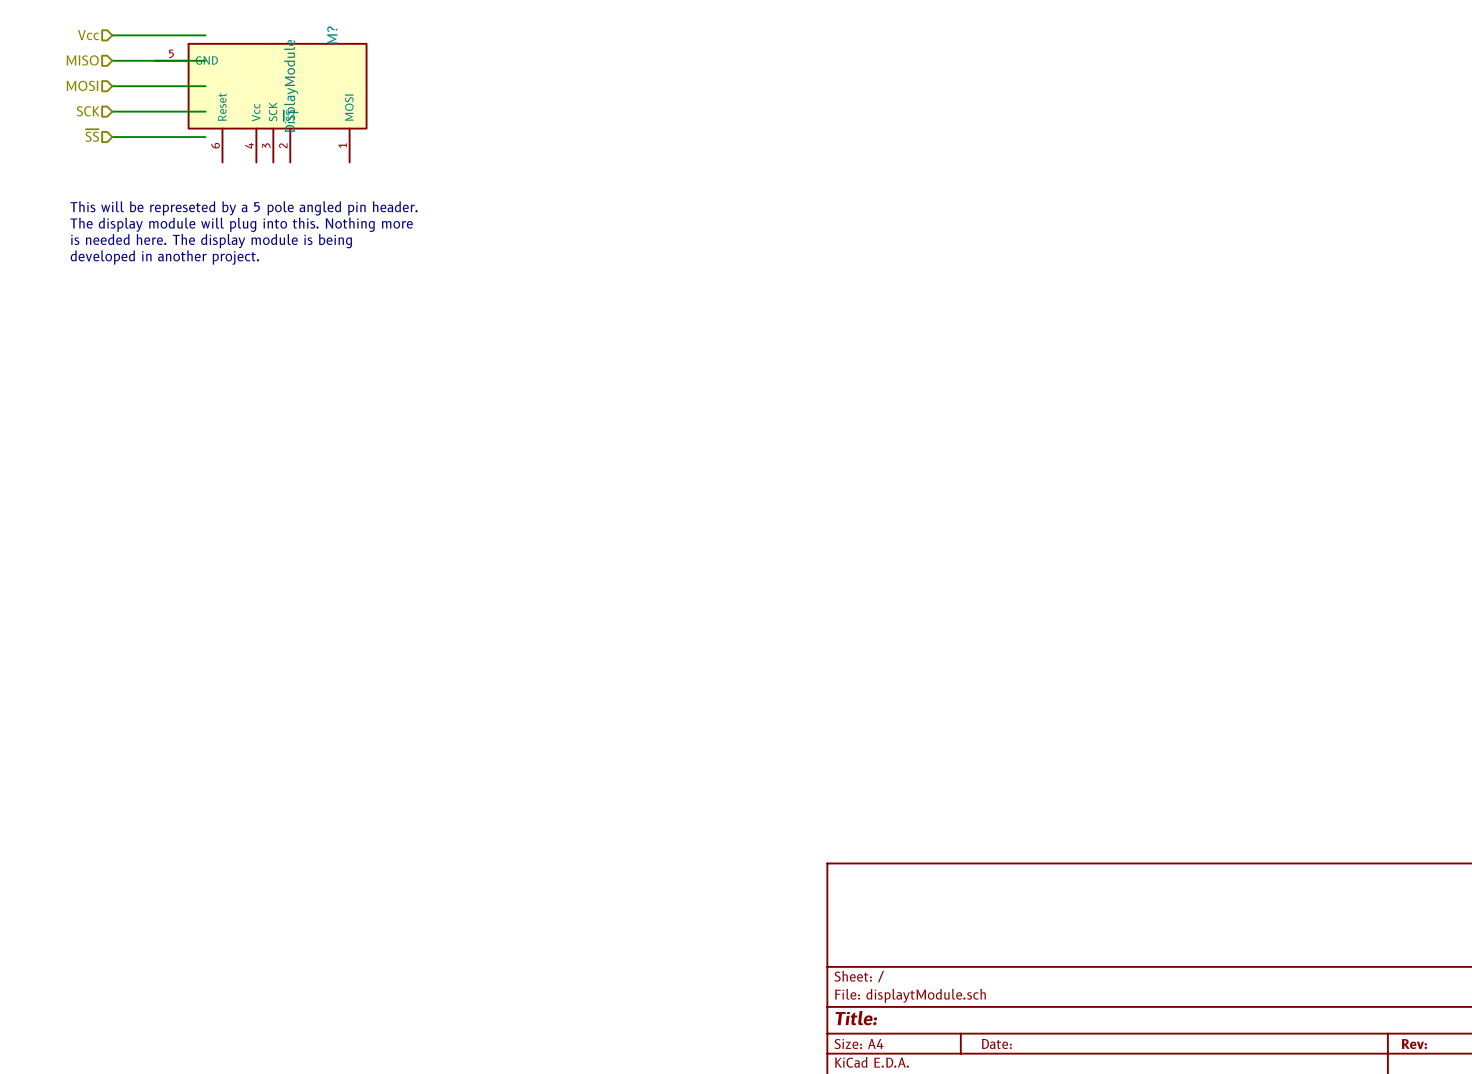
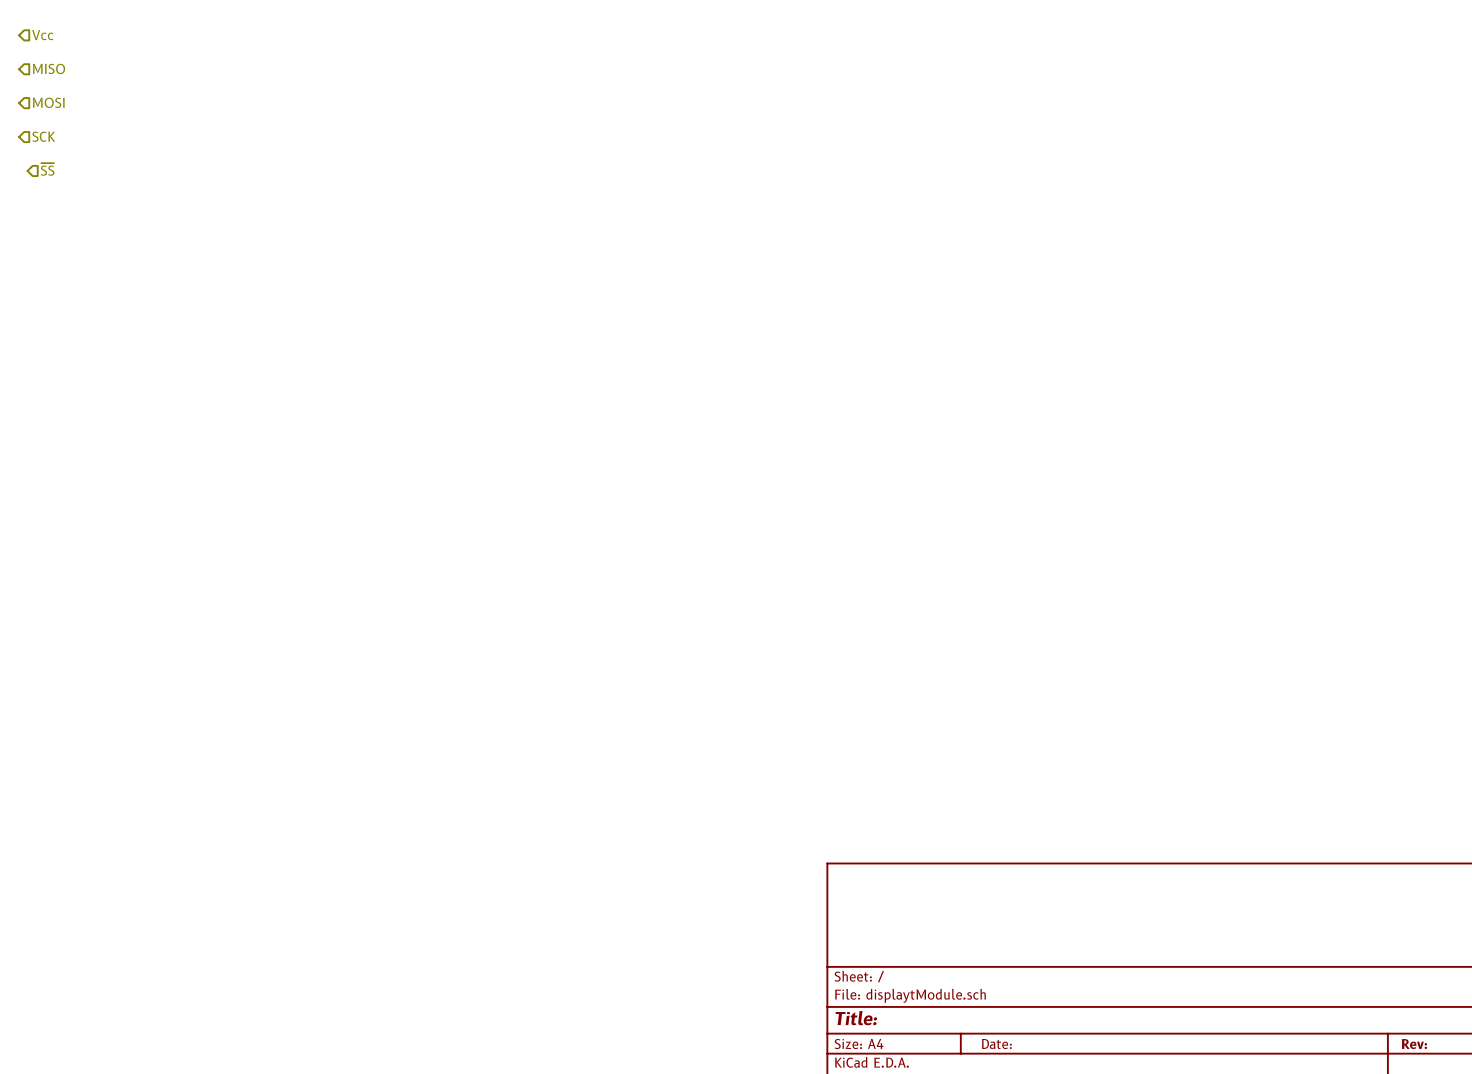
hierarchical label rotation: 0° (88, 35) -> 180° (42, 35)
hierarchical label position: Vcc (88, 35) -> Vcc (42, 35)
wire: (112, 35) (205, 35) -> none
hierarchical label rotation: 0° (82, 60) -> 180° (49, 68)
wire: (112, 60) (205, 60) -> none
hierarchical label rotation: 0° (82, 85) -> 180° (48, 102)
wire: (112, 86) (205, 86) -> none
M?: DisplayModule (260, 103) -> none
hierarchical label rotation: 0° (88, 111) -> 180° (43, 136)
hierarchical label position: SCK (88, 111) -> SCK (43, 136)
wire: (112, 111) (205, 111) -> none
hierarchical label rotation: 0° (92, 135) -> 180° (47, 169)
wire: (112, 137) (205, 137) -> none
text: This will be represeted by a 5 pole angled pin header. (244, 208) -> none
text: The display module will plug into this. Nothing more (241, 224) -> none
text: is needed here. The display module is being (211, 241) -> none
text: developed in another project. (164, 257) -> none

